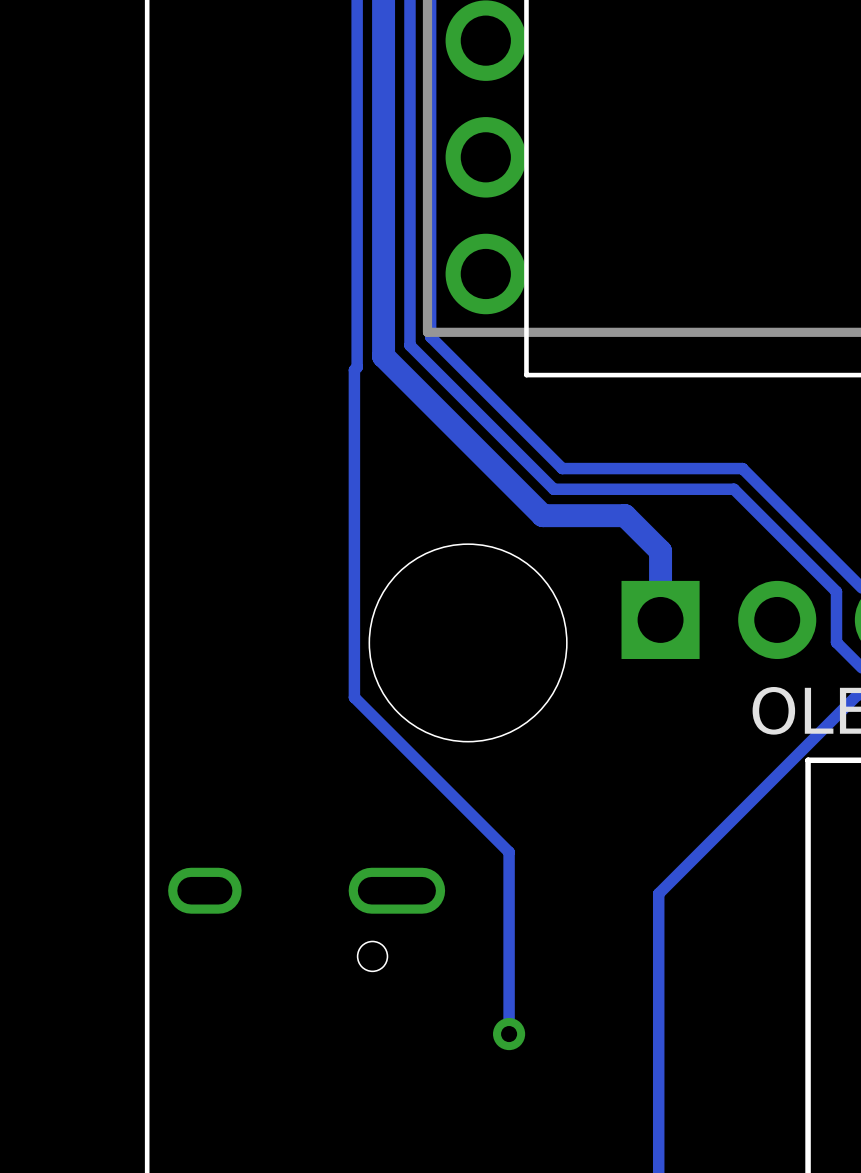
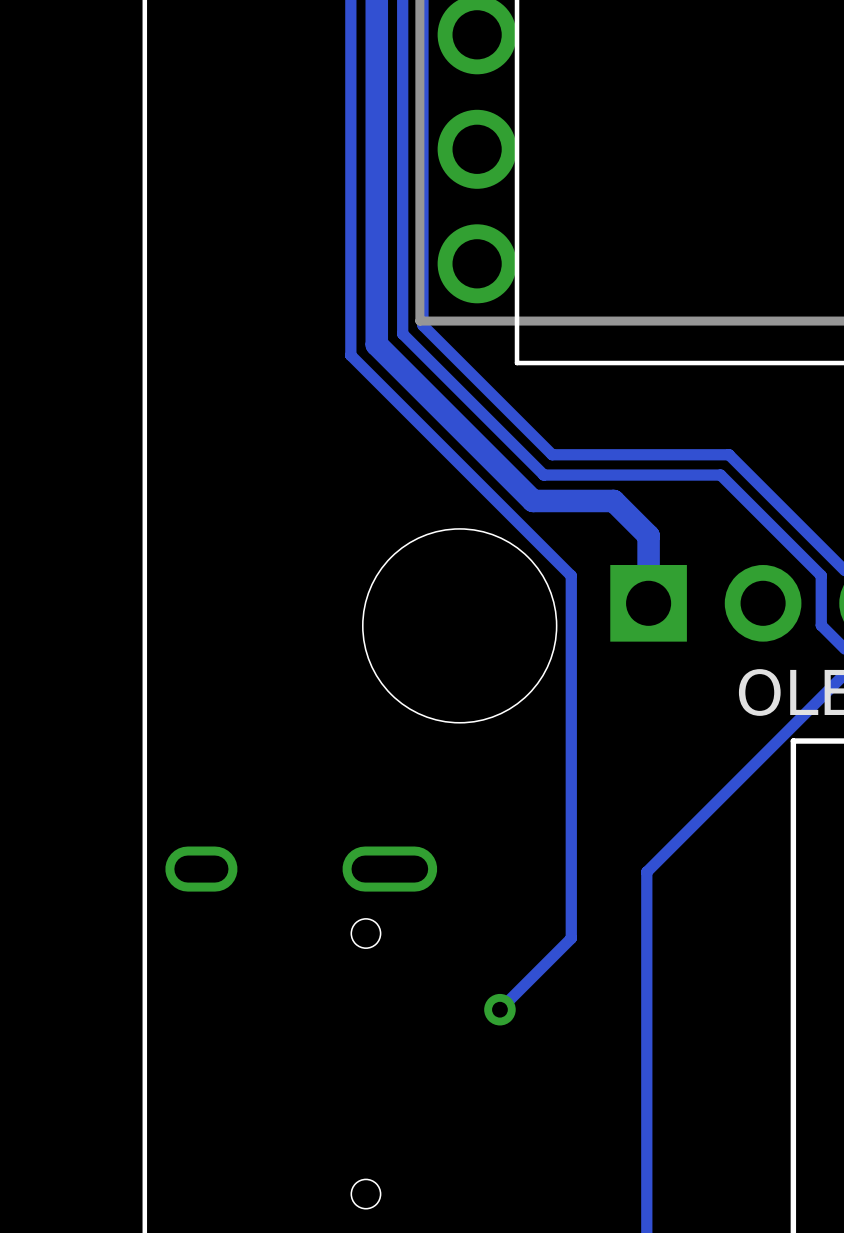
track: (357, 367) (354, 370) (354, 697) (509, 852) (509, 1034) -> (350, 355) (571, 575) (571, 938) (499, 1009)

